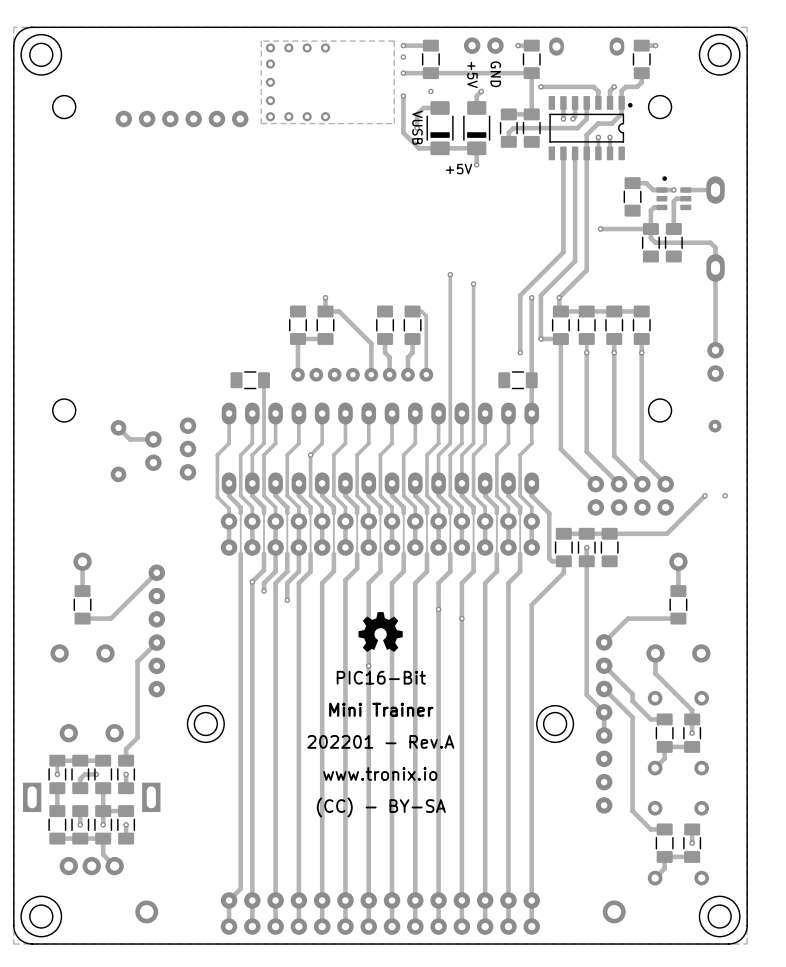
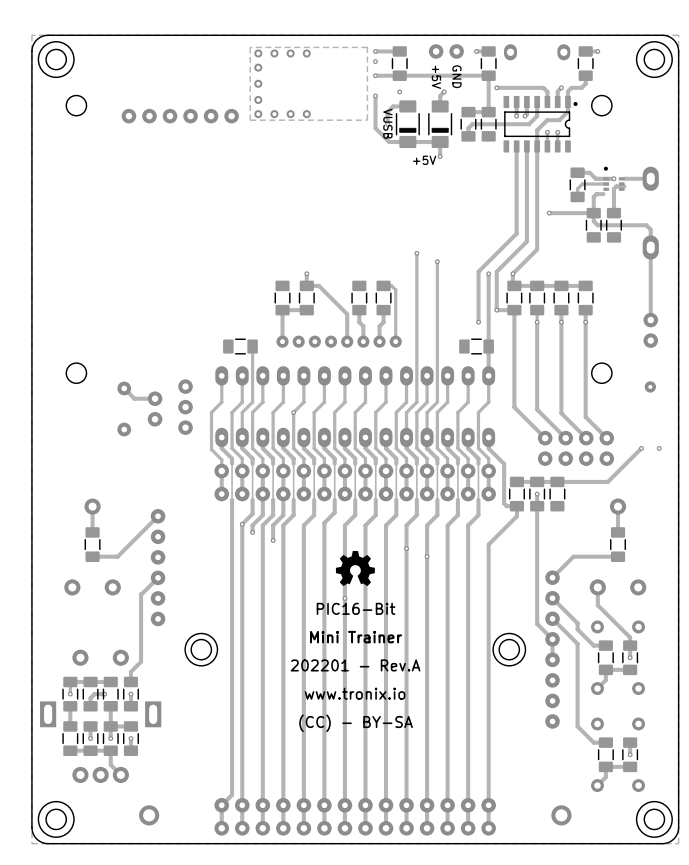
part footprint: [656, 187, 692, 211] -> [603, 177, 625, 191]
track: none -> (606, 184) (582, 184) (577, 188) (577, 196)

